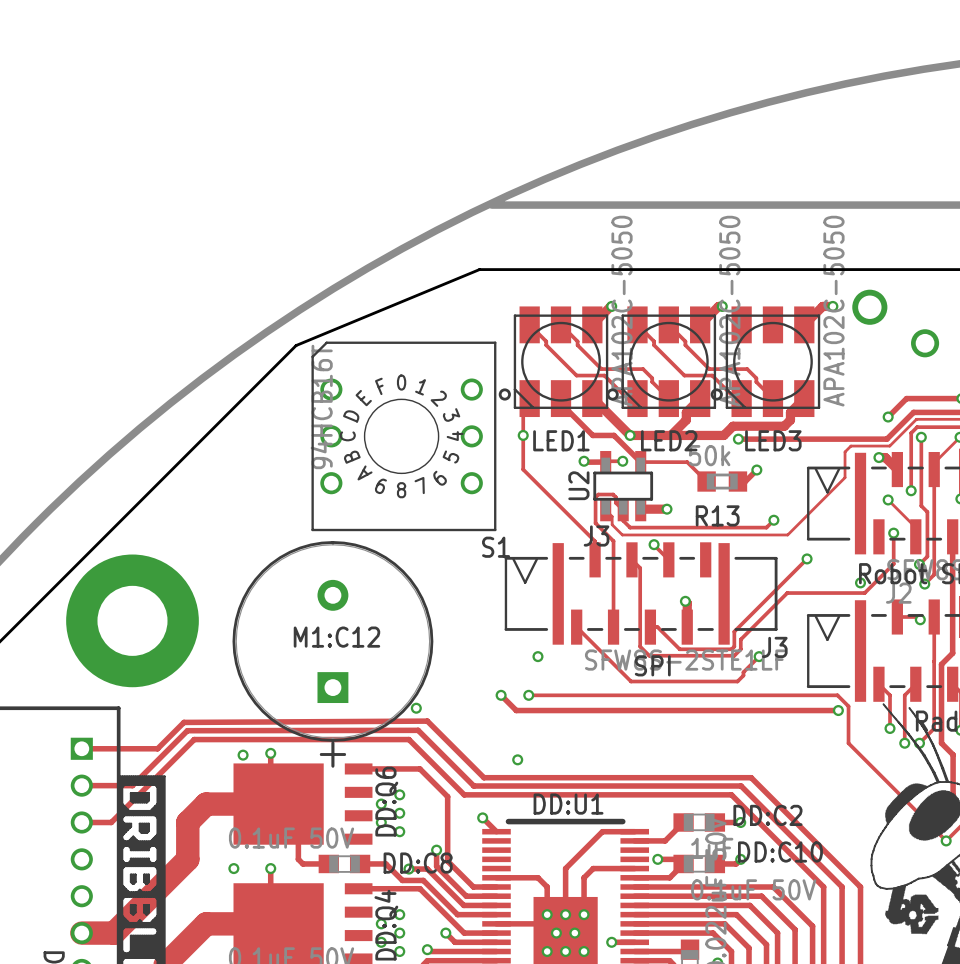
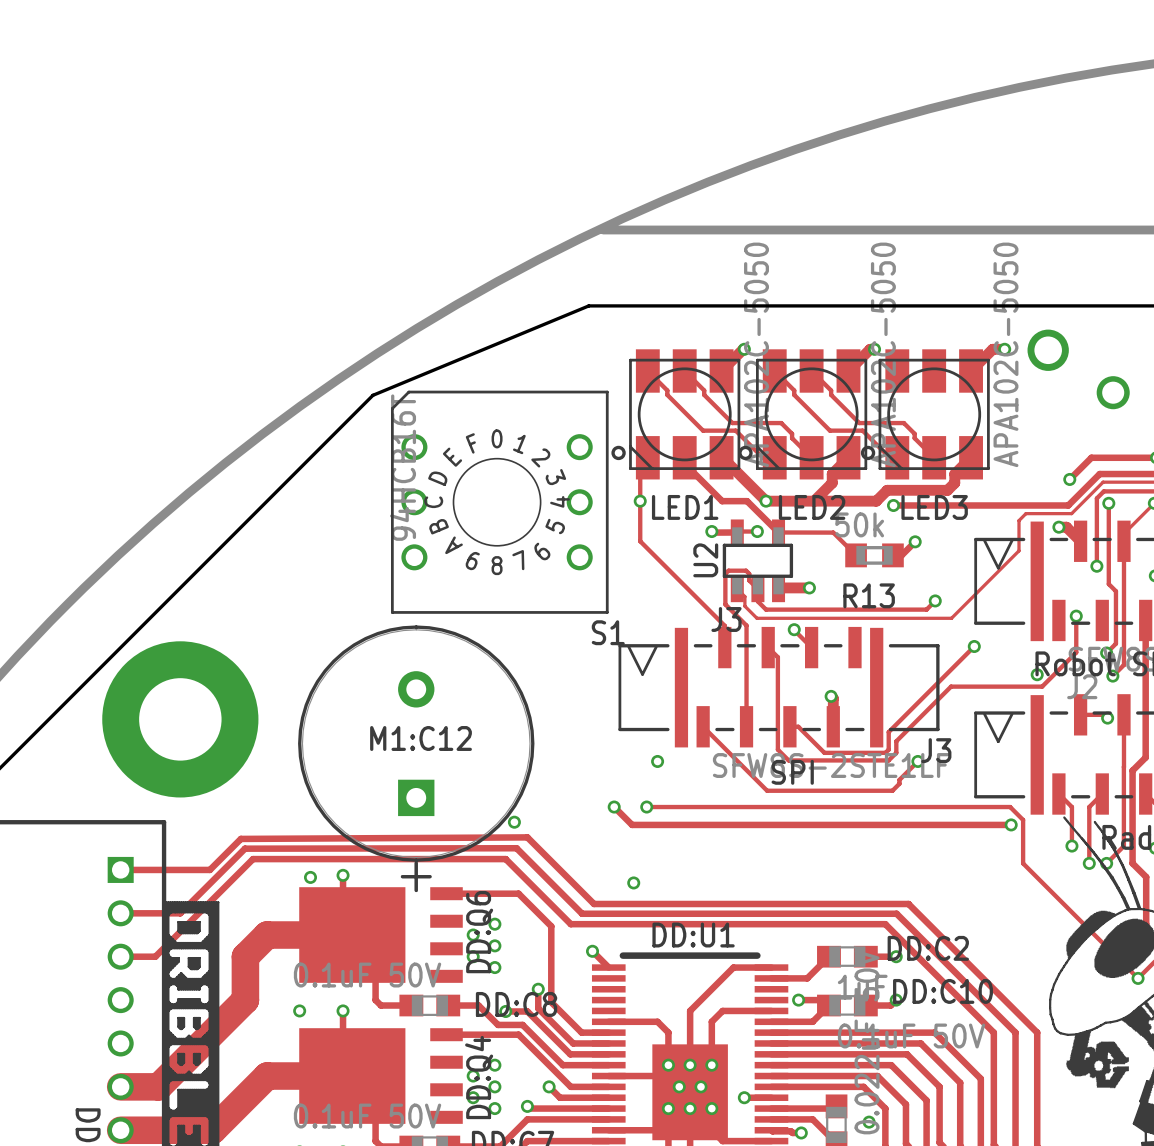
track: (888, 499) (915, 527) (915, 536) -> none
via: (888, 499) -> none

